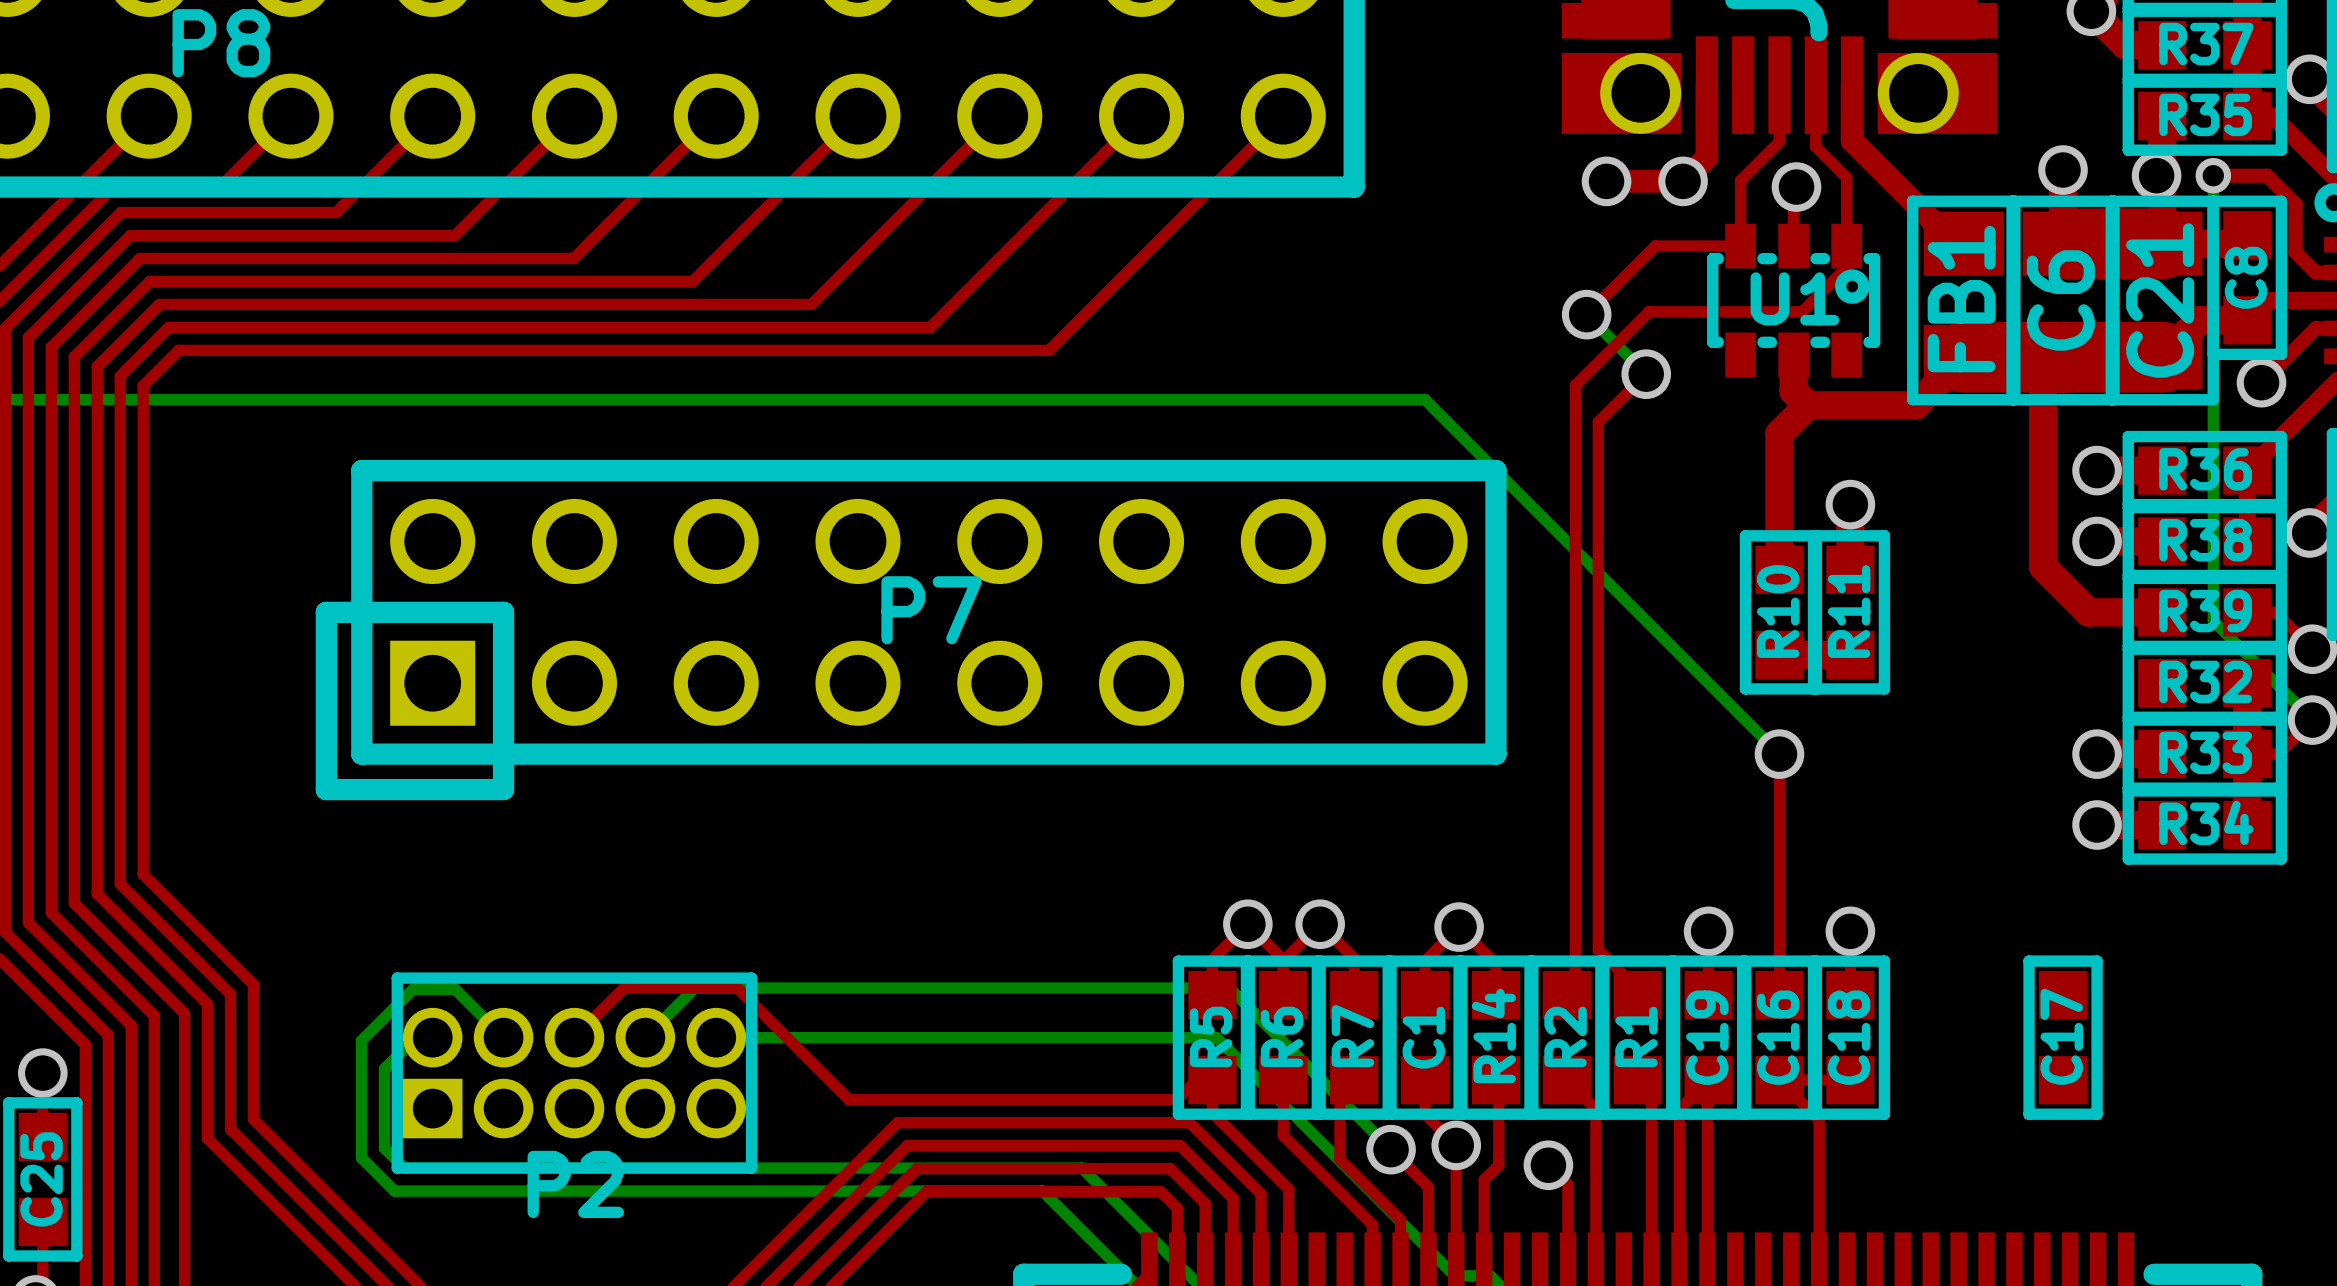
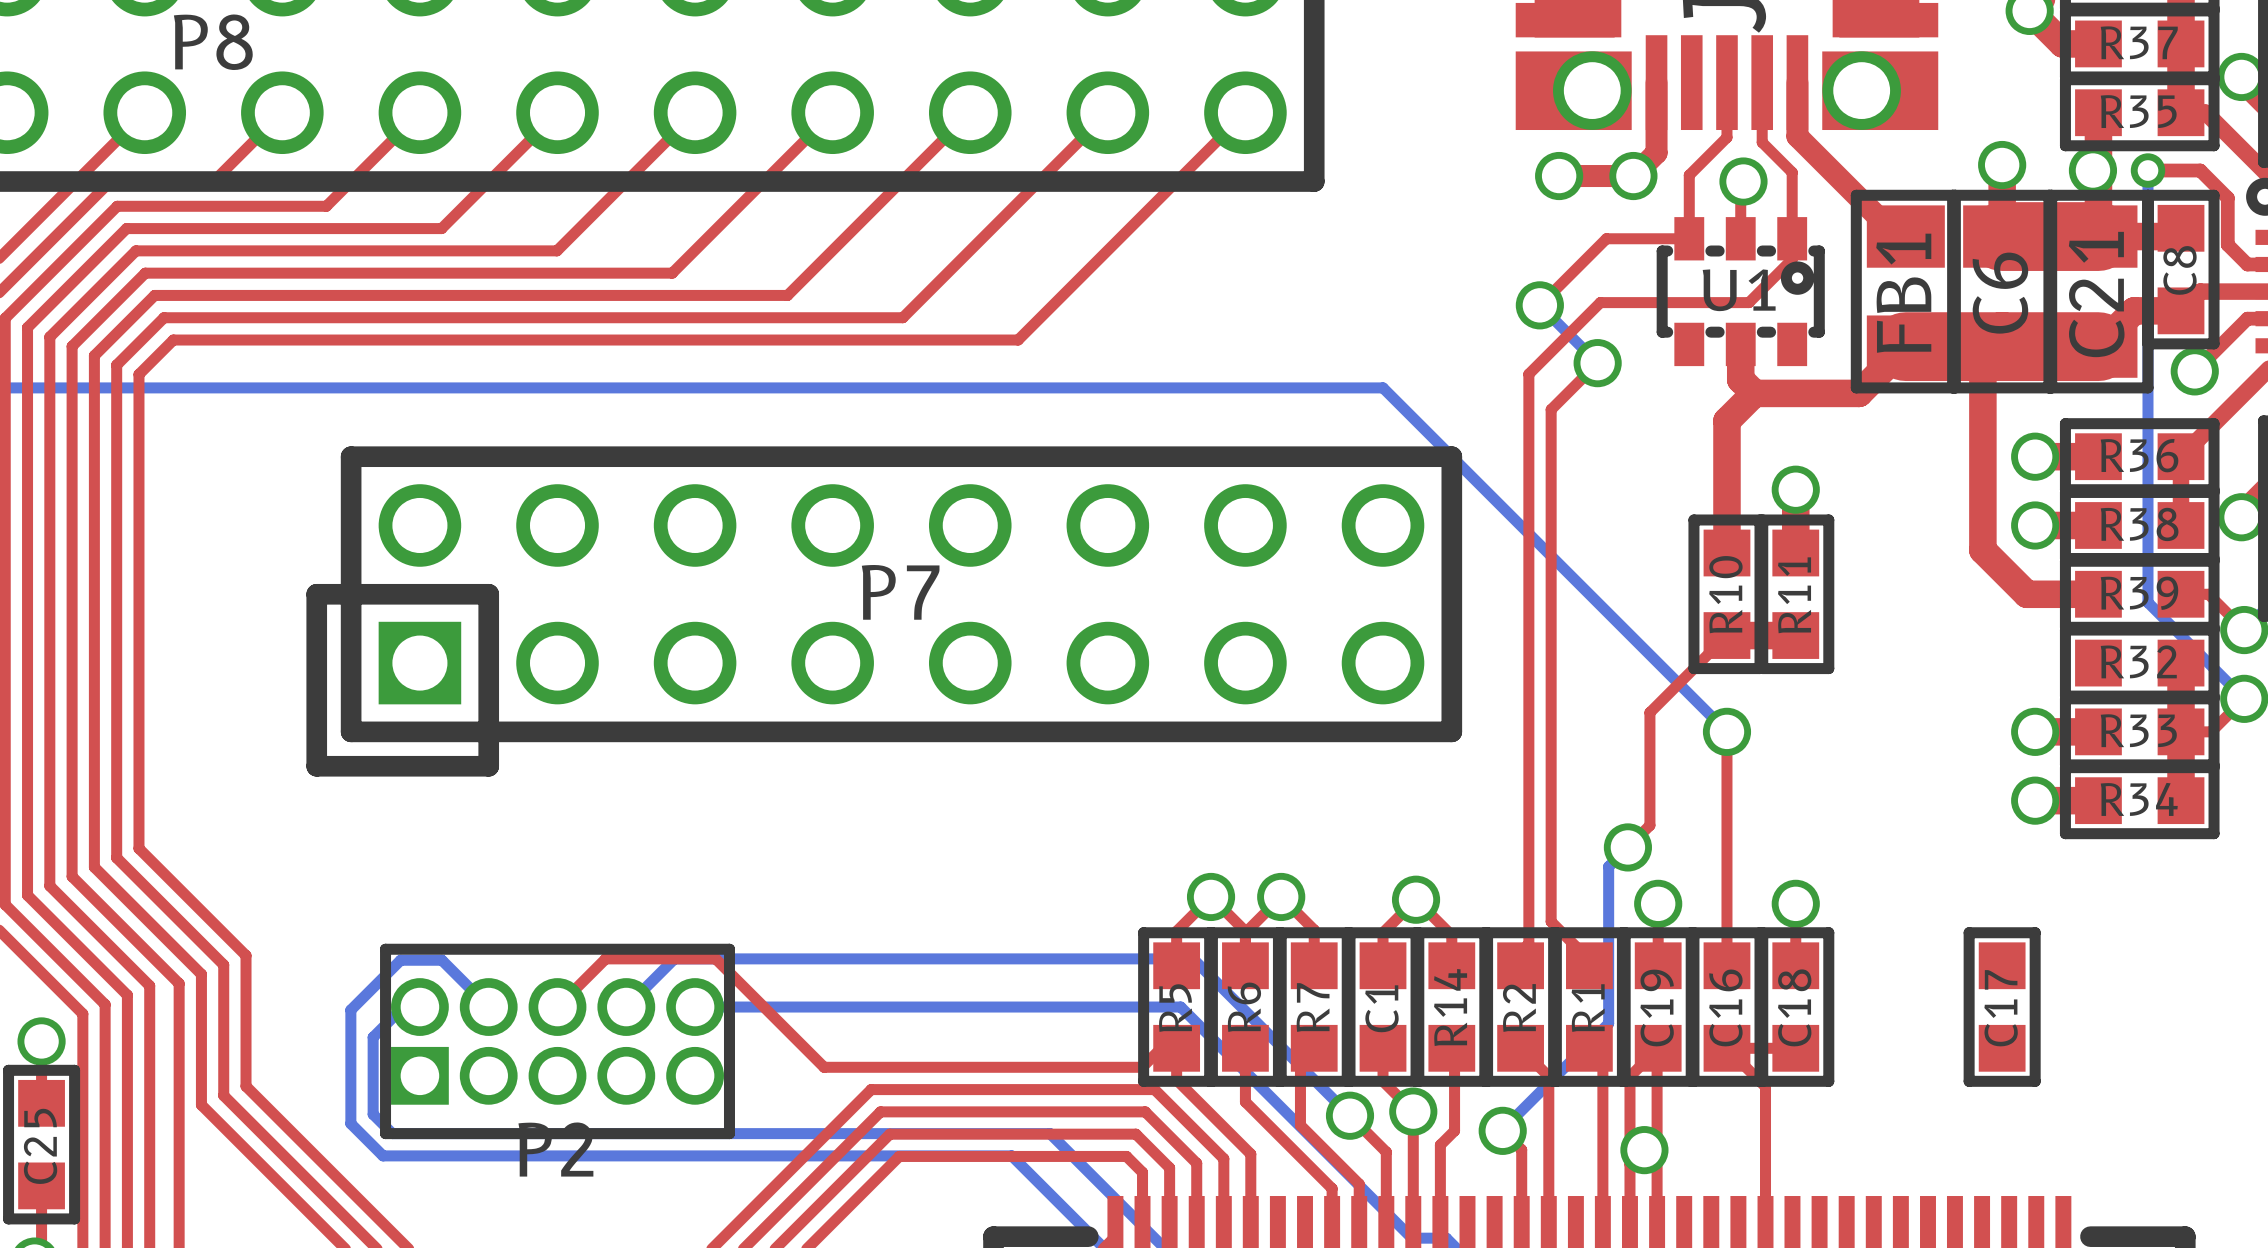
top track: none -> (1726, 635) (1649, 712) (1649, 825) (1627, 847)
bottom track: none -> (1627, 847) (1608, 866) (1608, 1023) (1502, 1130)
via: none -> (1627, 847)
via: none -> (1644, 1150)

